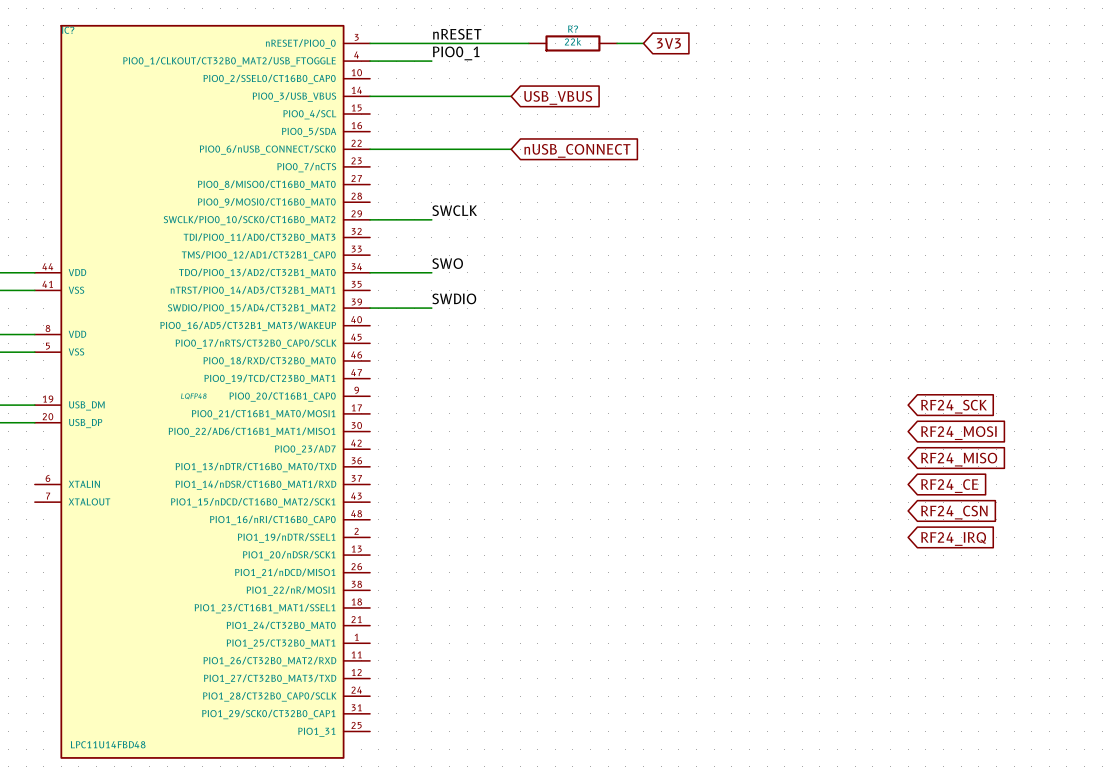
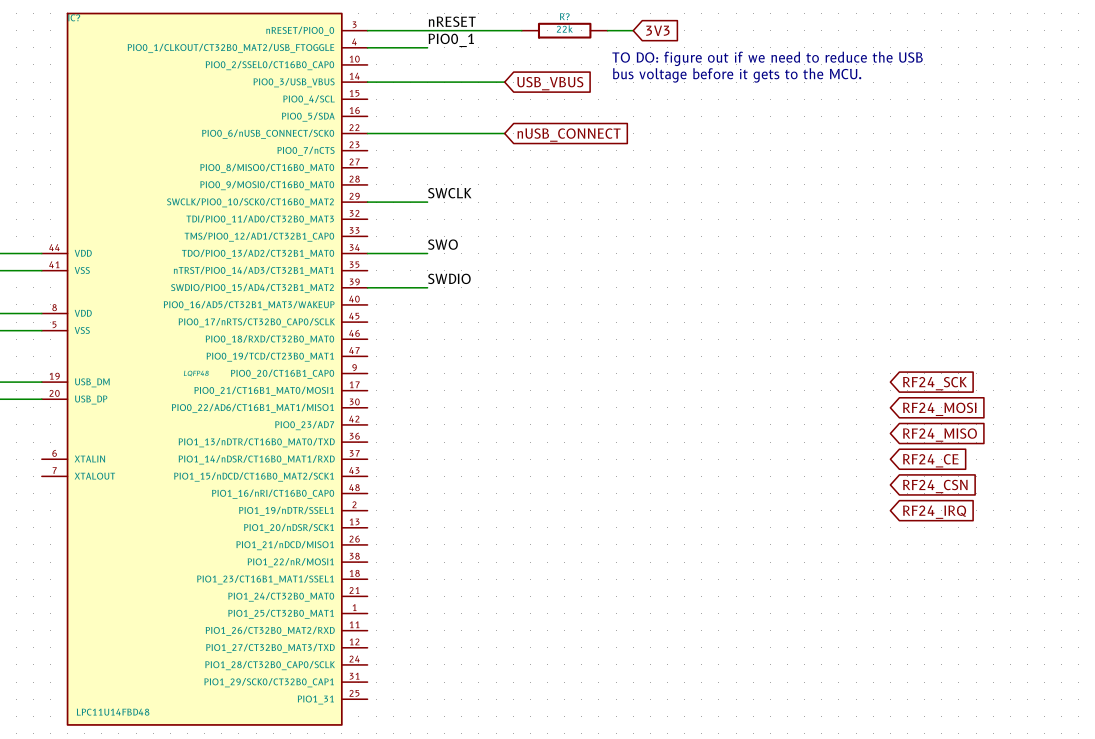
text: none -> TO DO: figure out if we need to reduce the USB (767, 58)
text: none -> bus voltage before it gets to the MCU. (737, 75)

